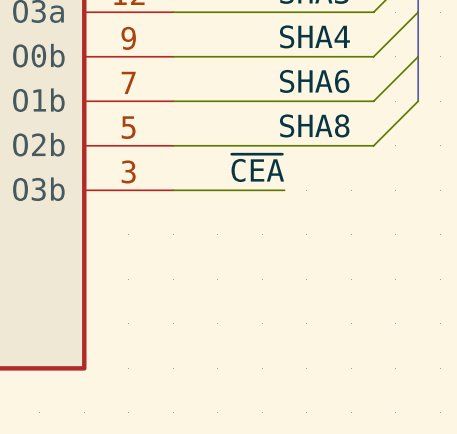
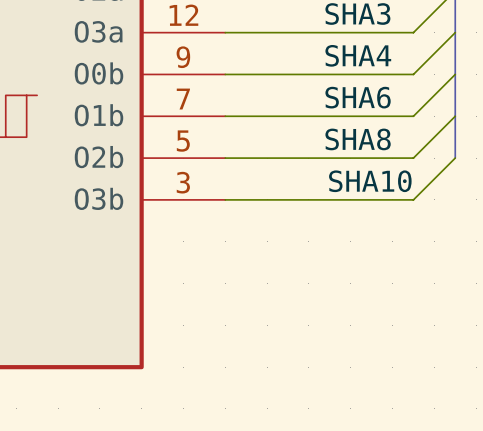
bus: none -> (455, 116) (455, 158)
wire: none -> (455, 158) (413, 199) (329, 199)
label: ~{CEA} (257, 168) -> none
label: none -> SHA10 (370, 181)

